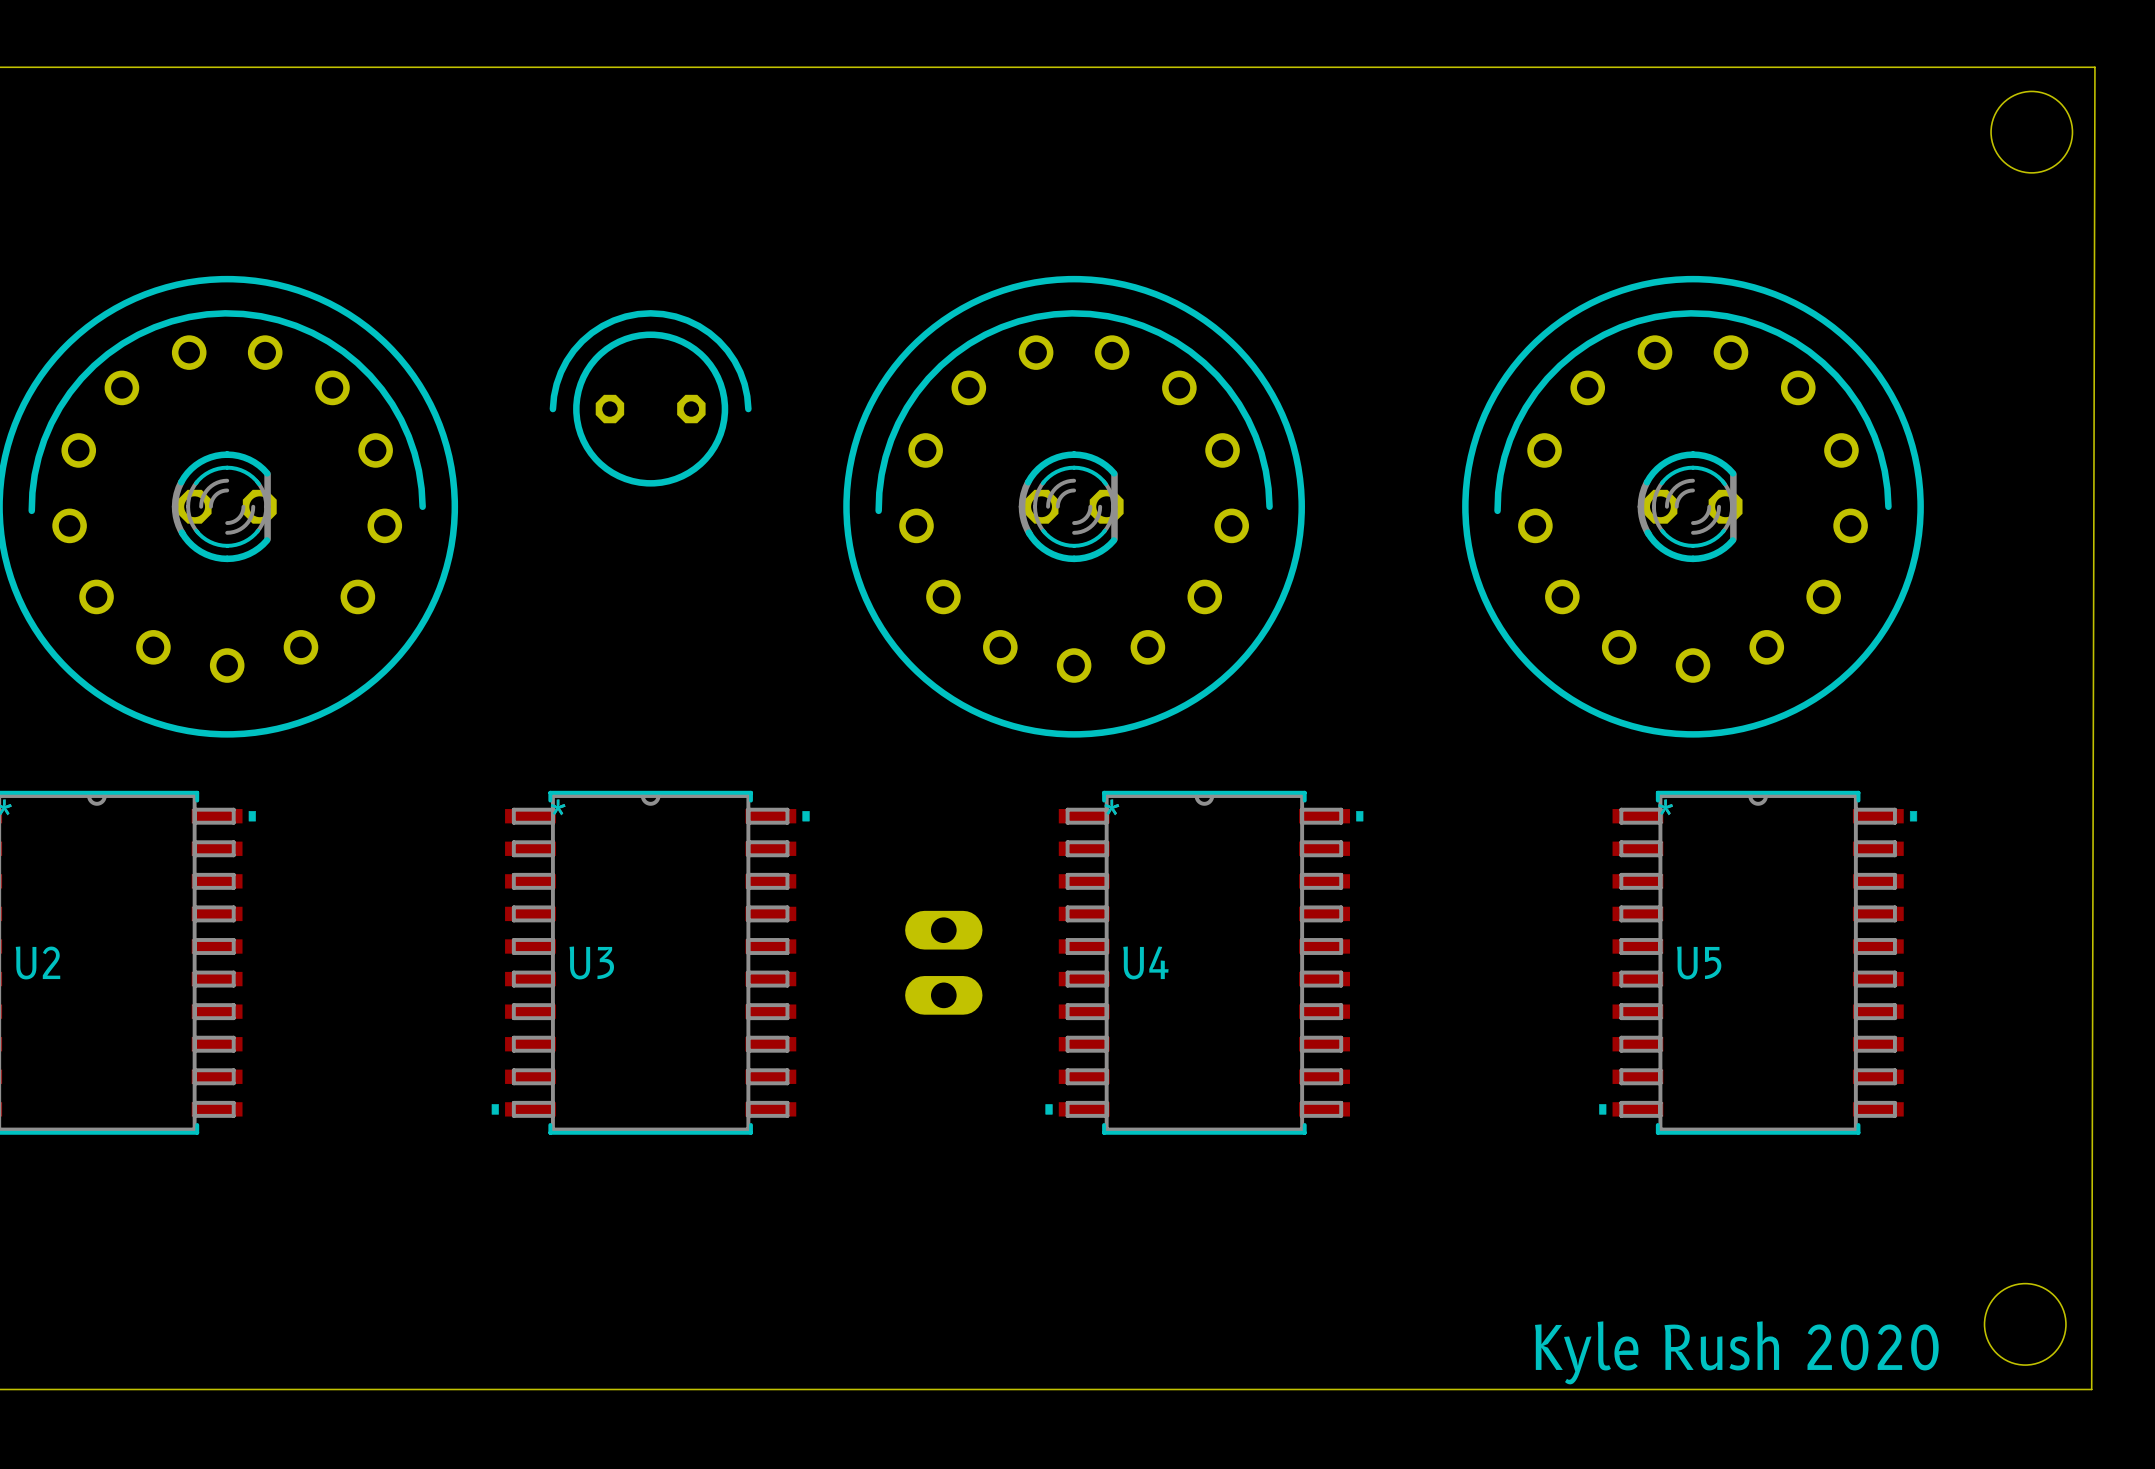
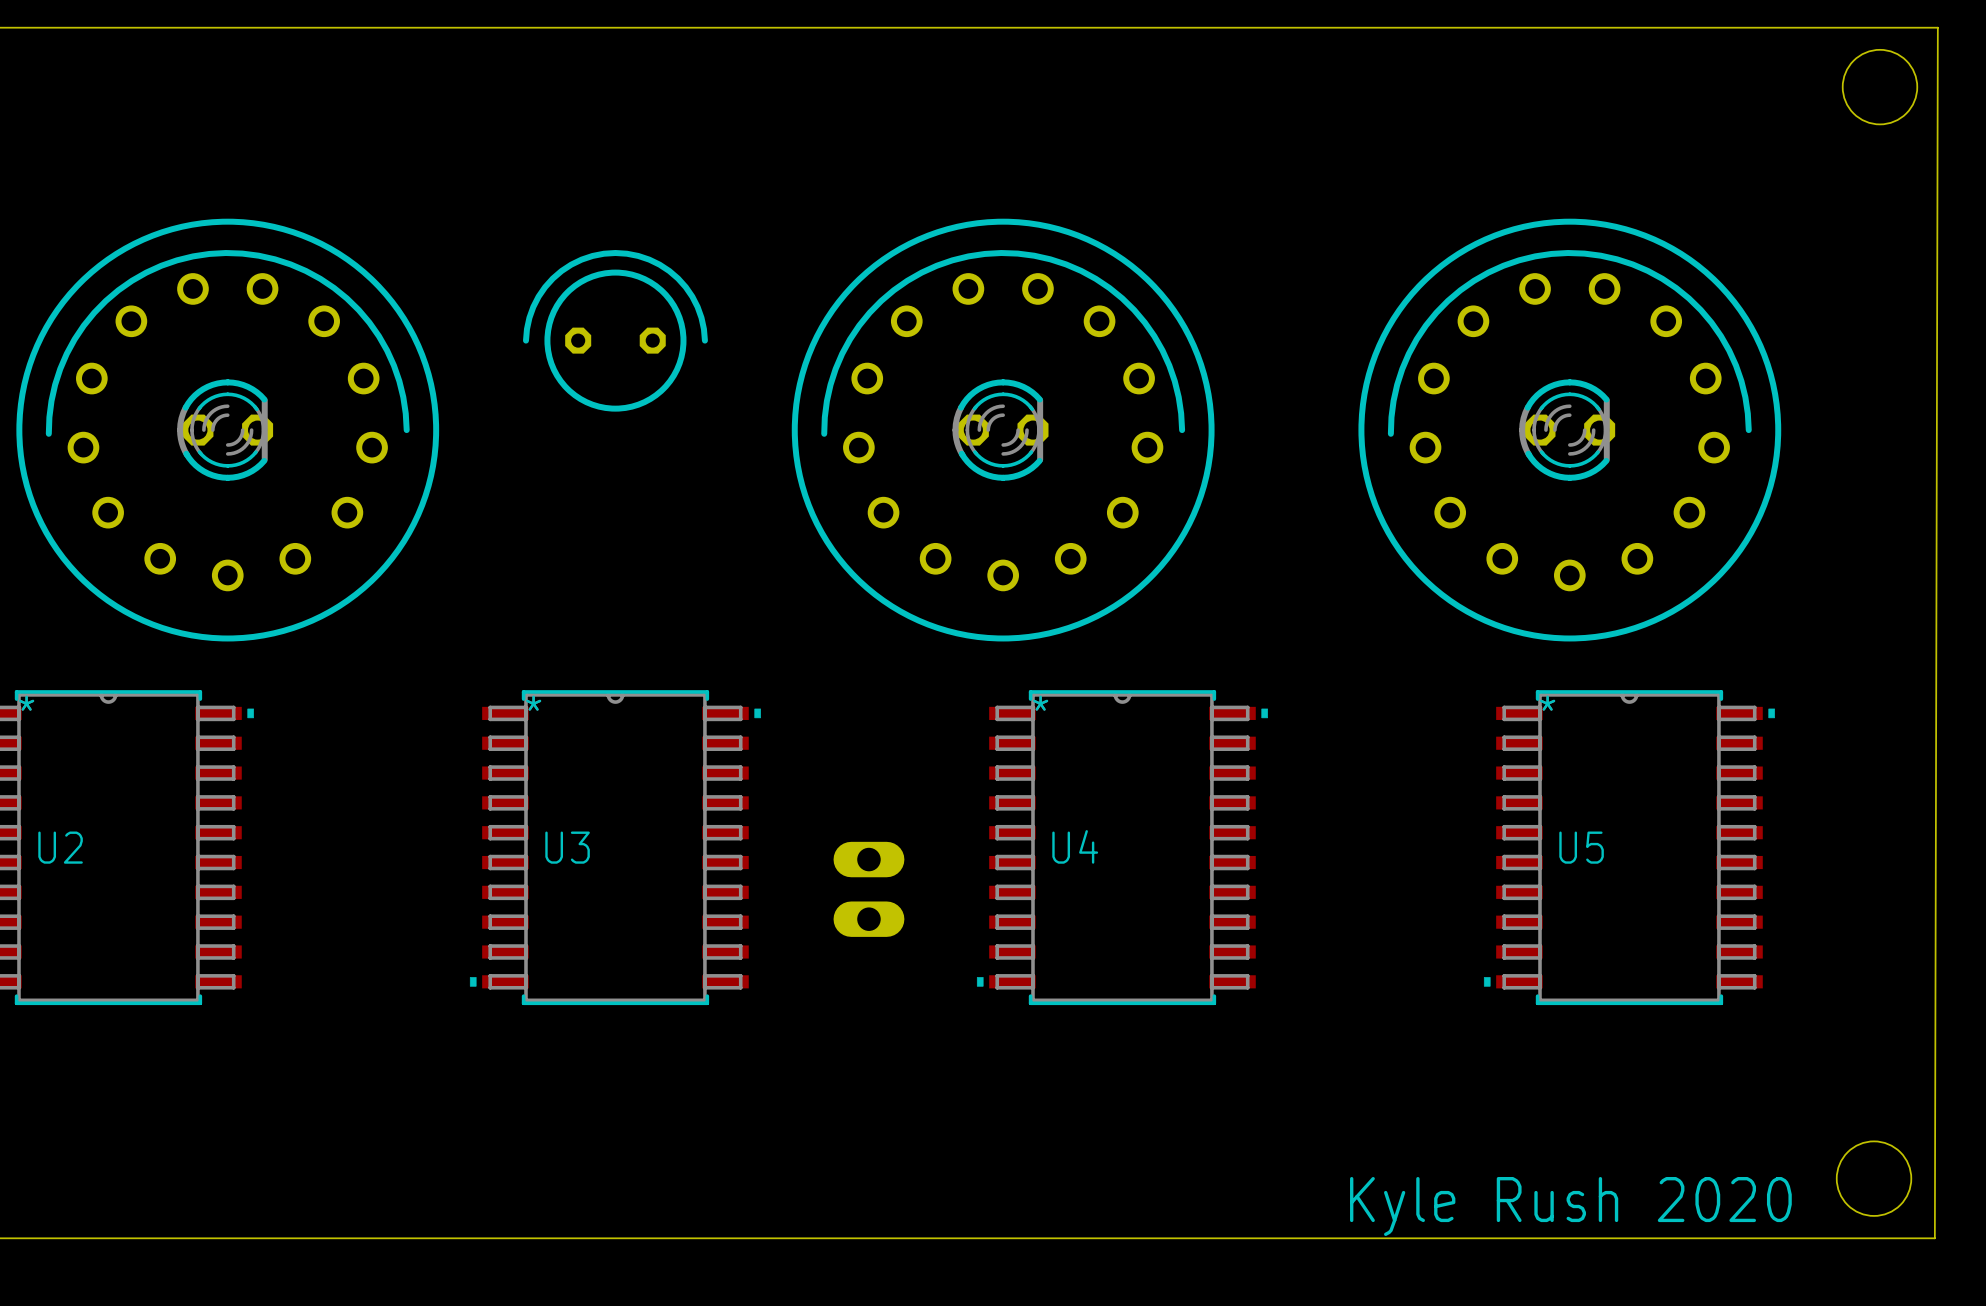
part position: (943, 962) -> (868, 889)

